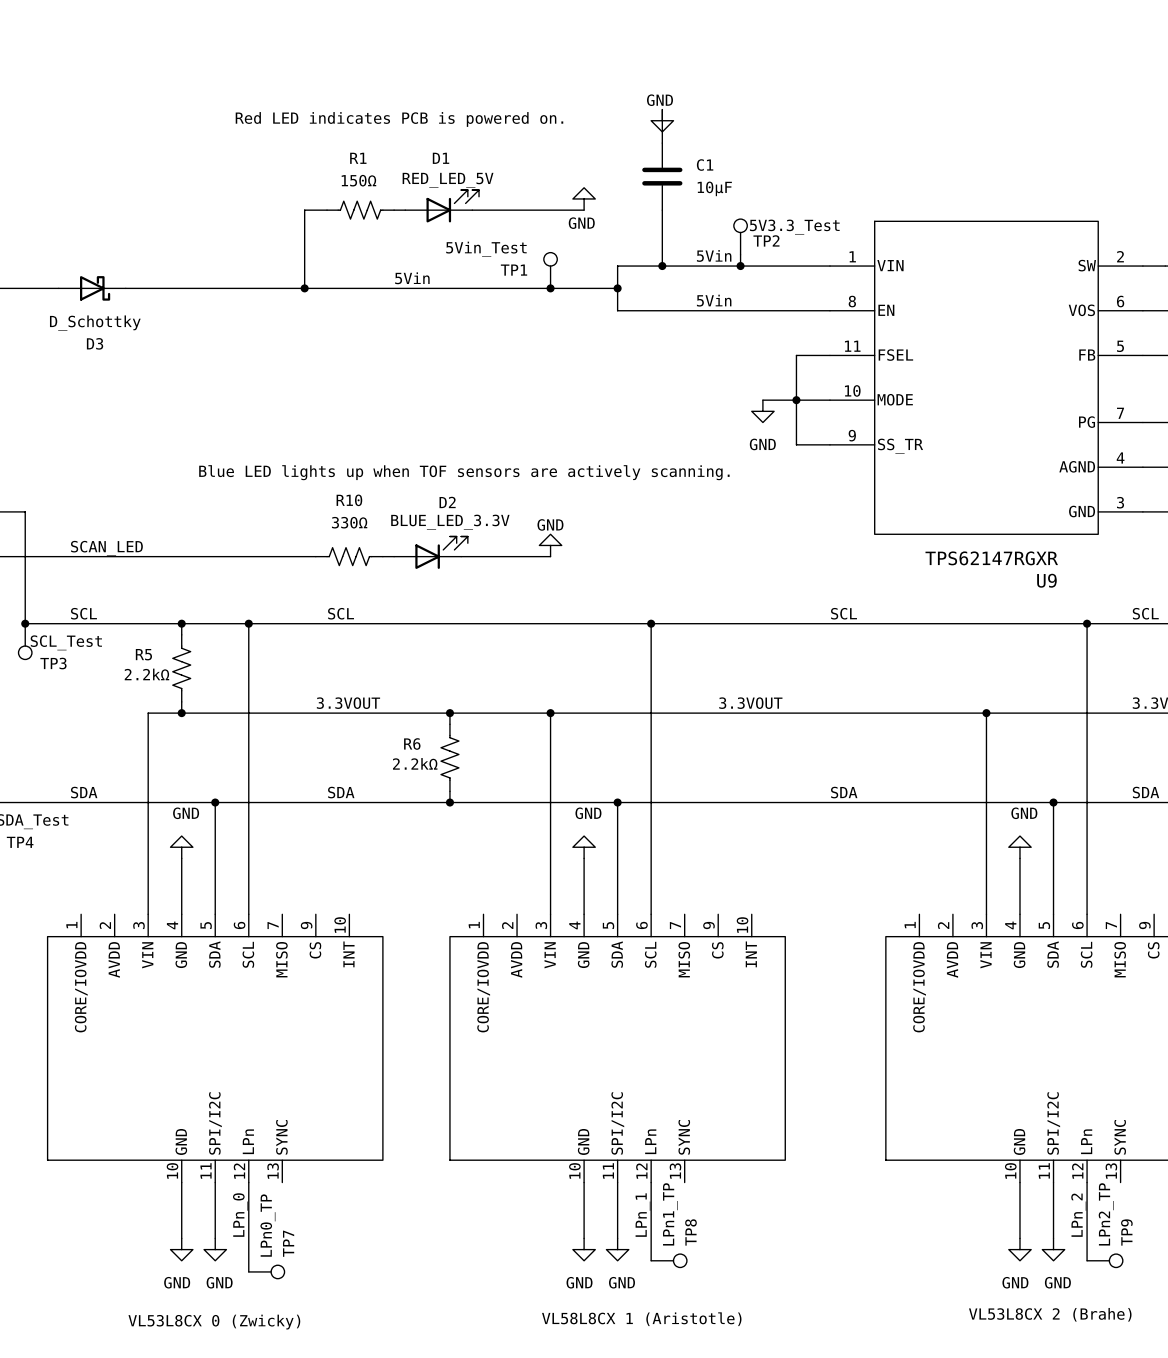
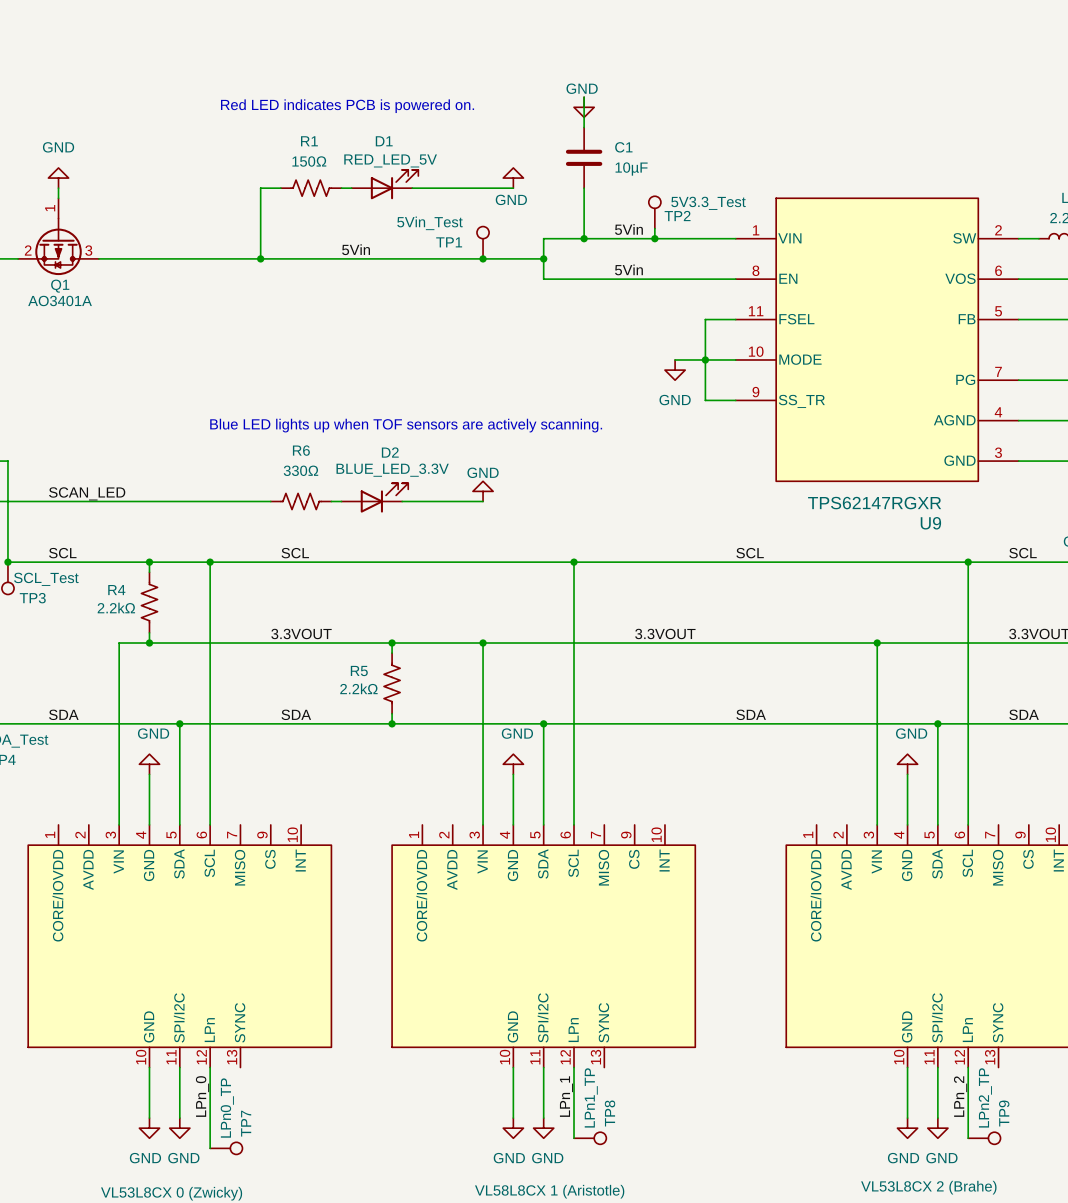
power symbol: none -> GND (58, 178)
wire: none -> (58, 188) (58, 198)
Q1: none -> AO3401A (58, 236)
D3: D_Schottky (92, 288) -> none
R10 name: R10 (349, 500) -> R6 (301, 450)
R5 name: R5 (143, 654) -> R4 (116, 590)
R6 name: R6 (412, 744) -> R5 (359, 671)

